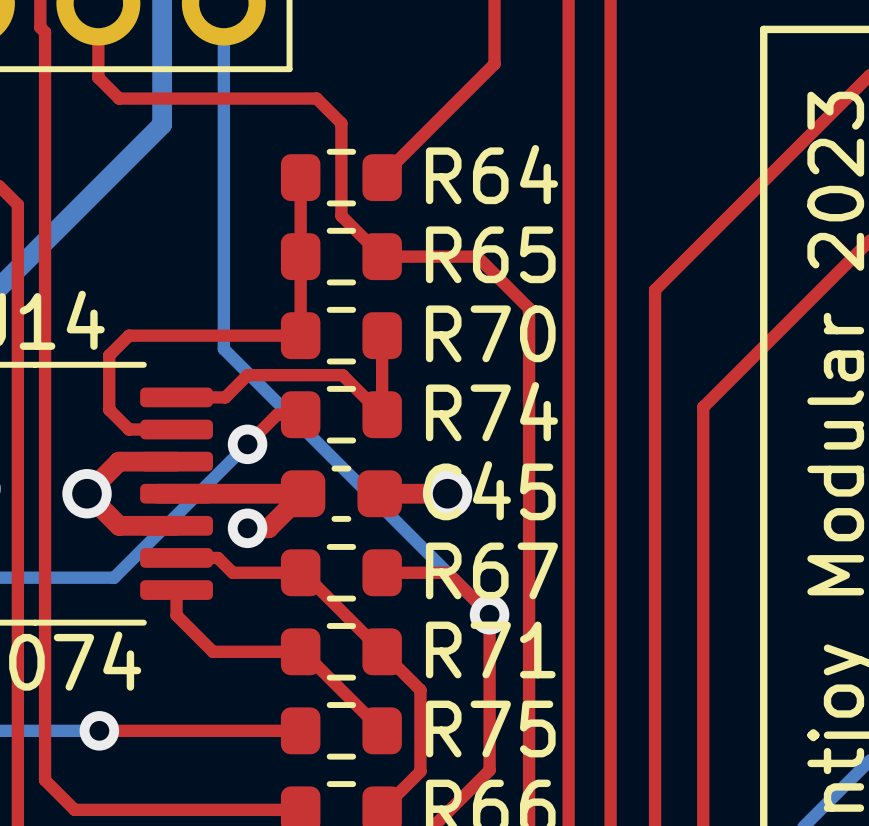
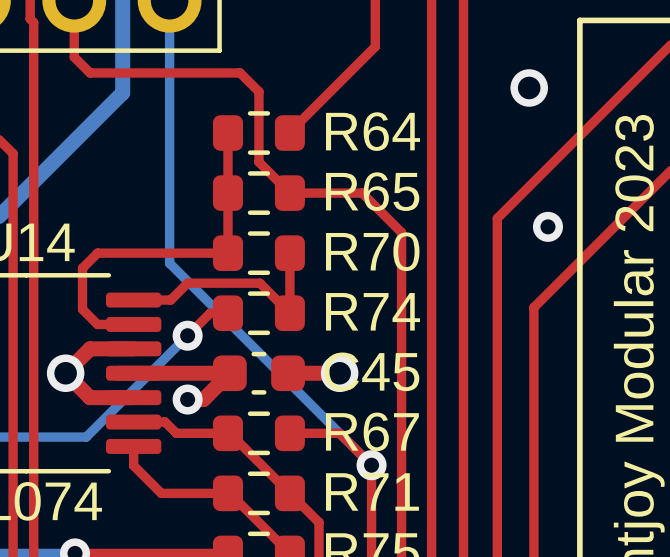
via: none -> (529, 87)
via: none -> (547, 226)

